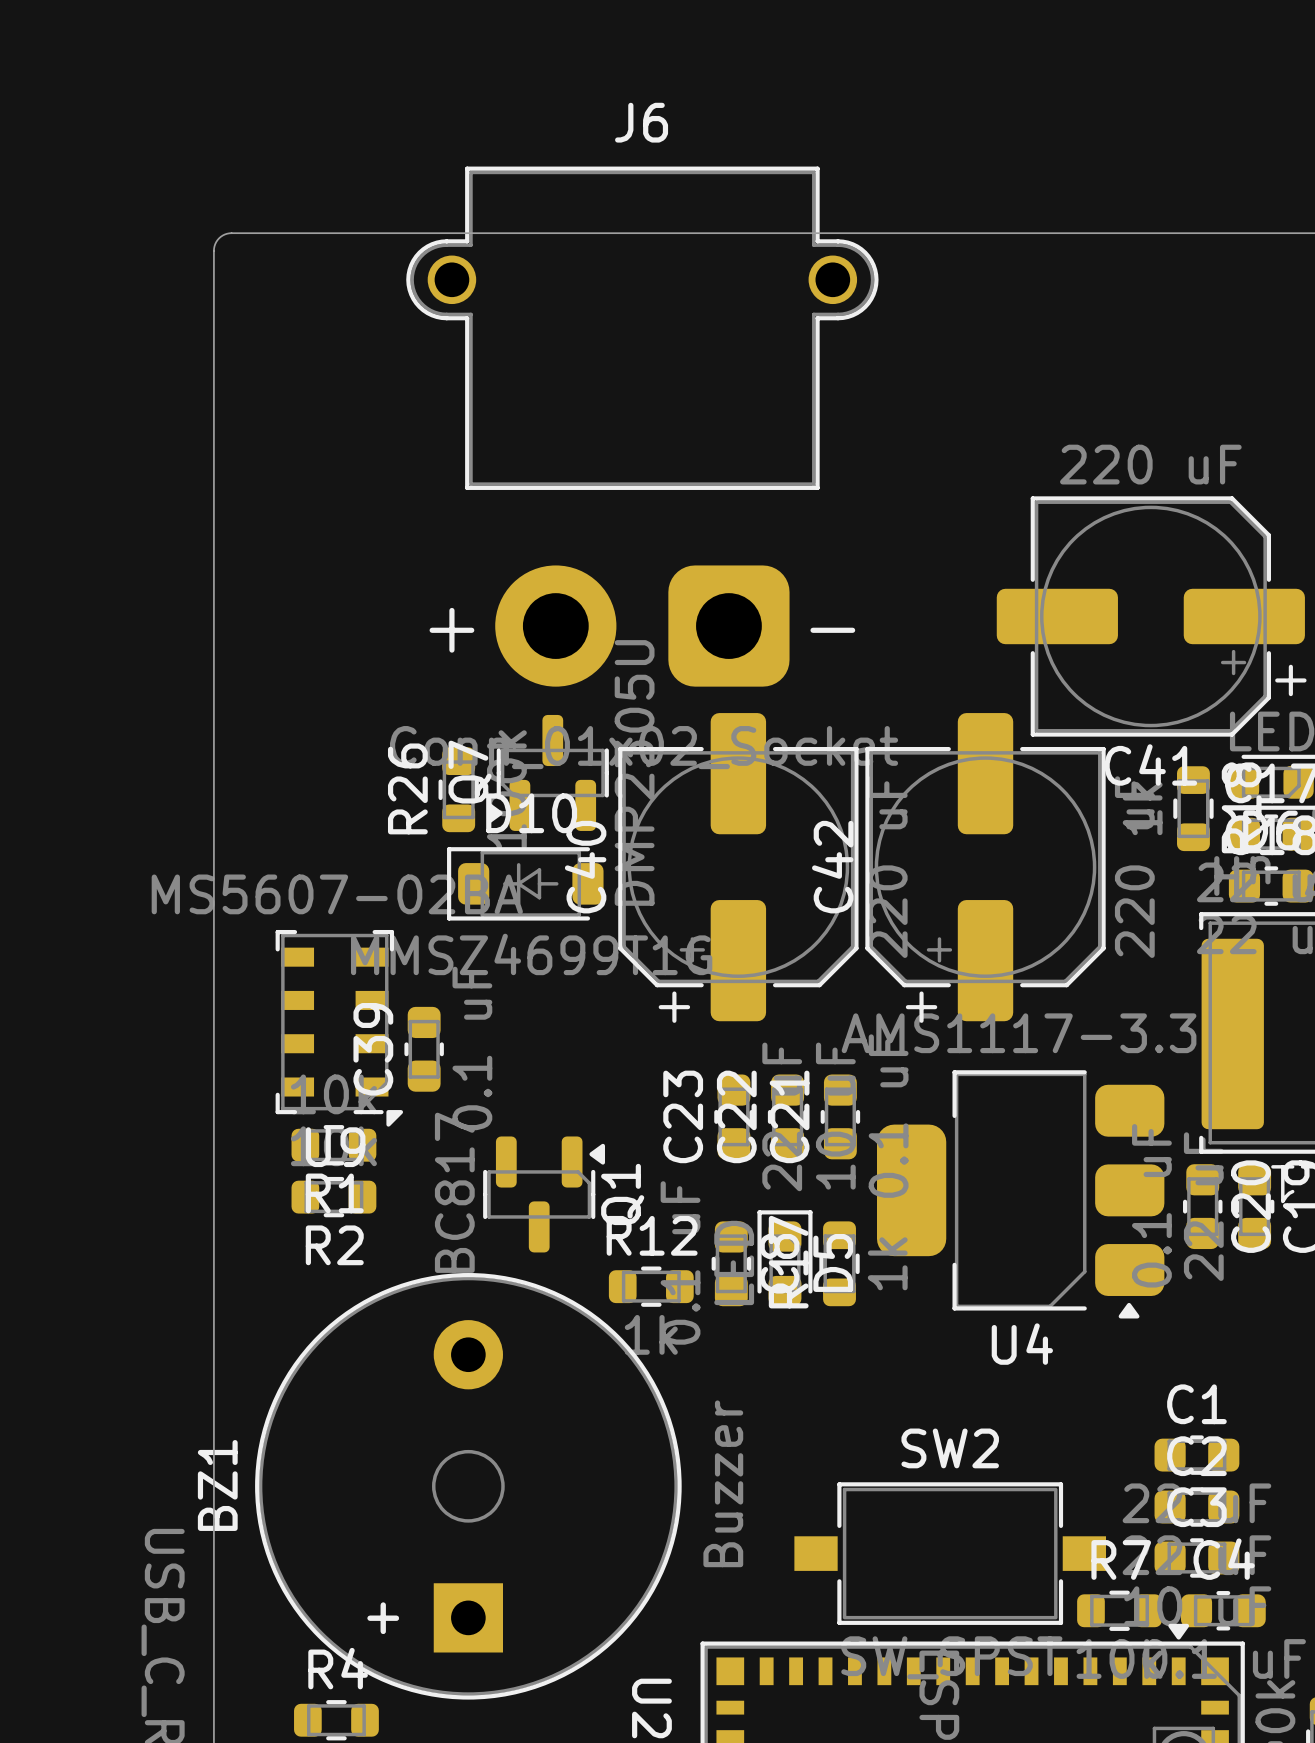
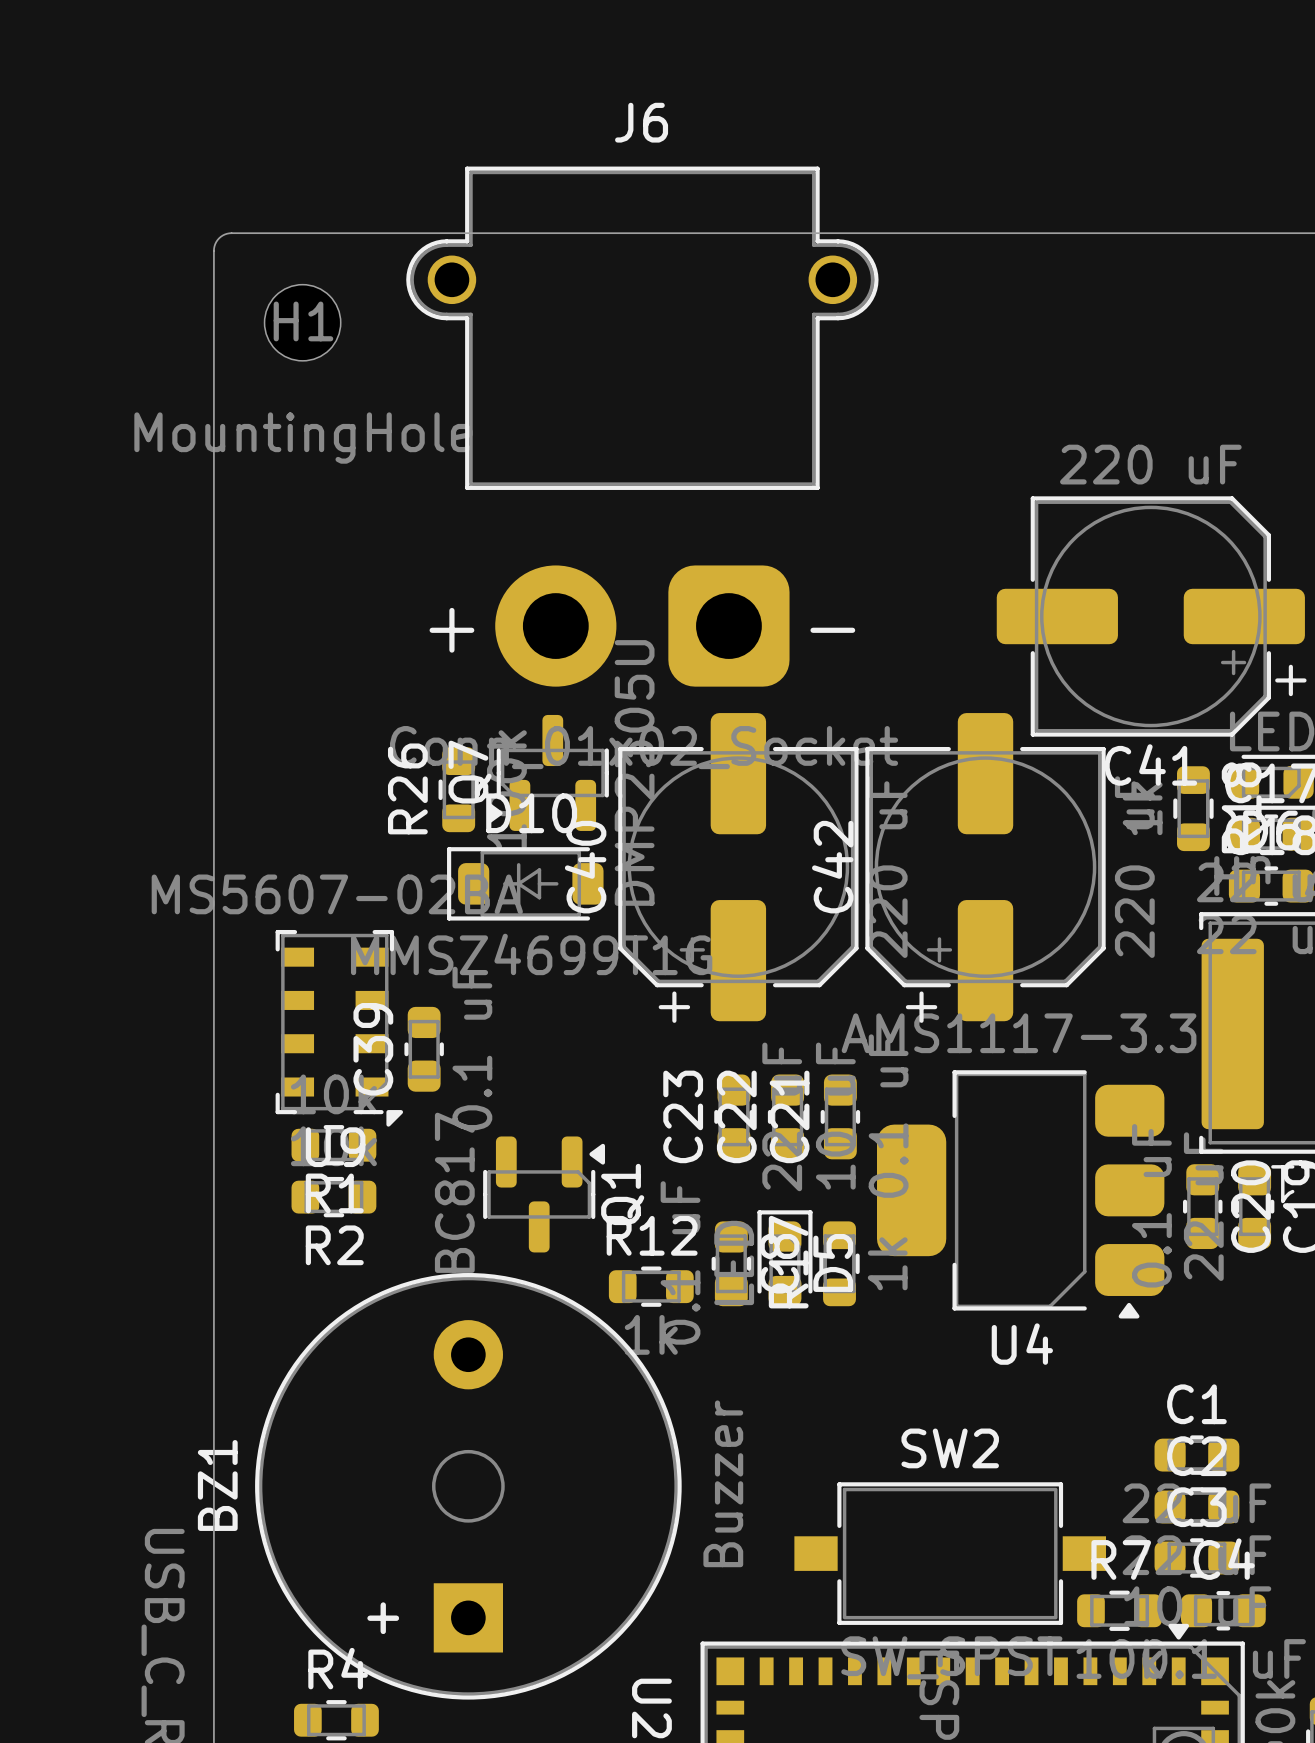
H1: none -> MountingHole (302, 322)

